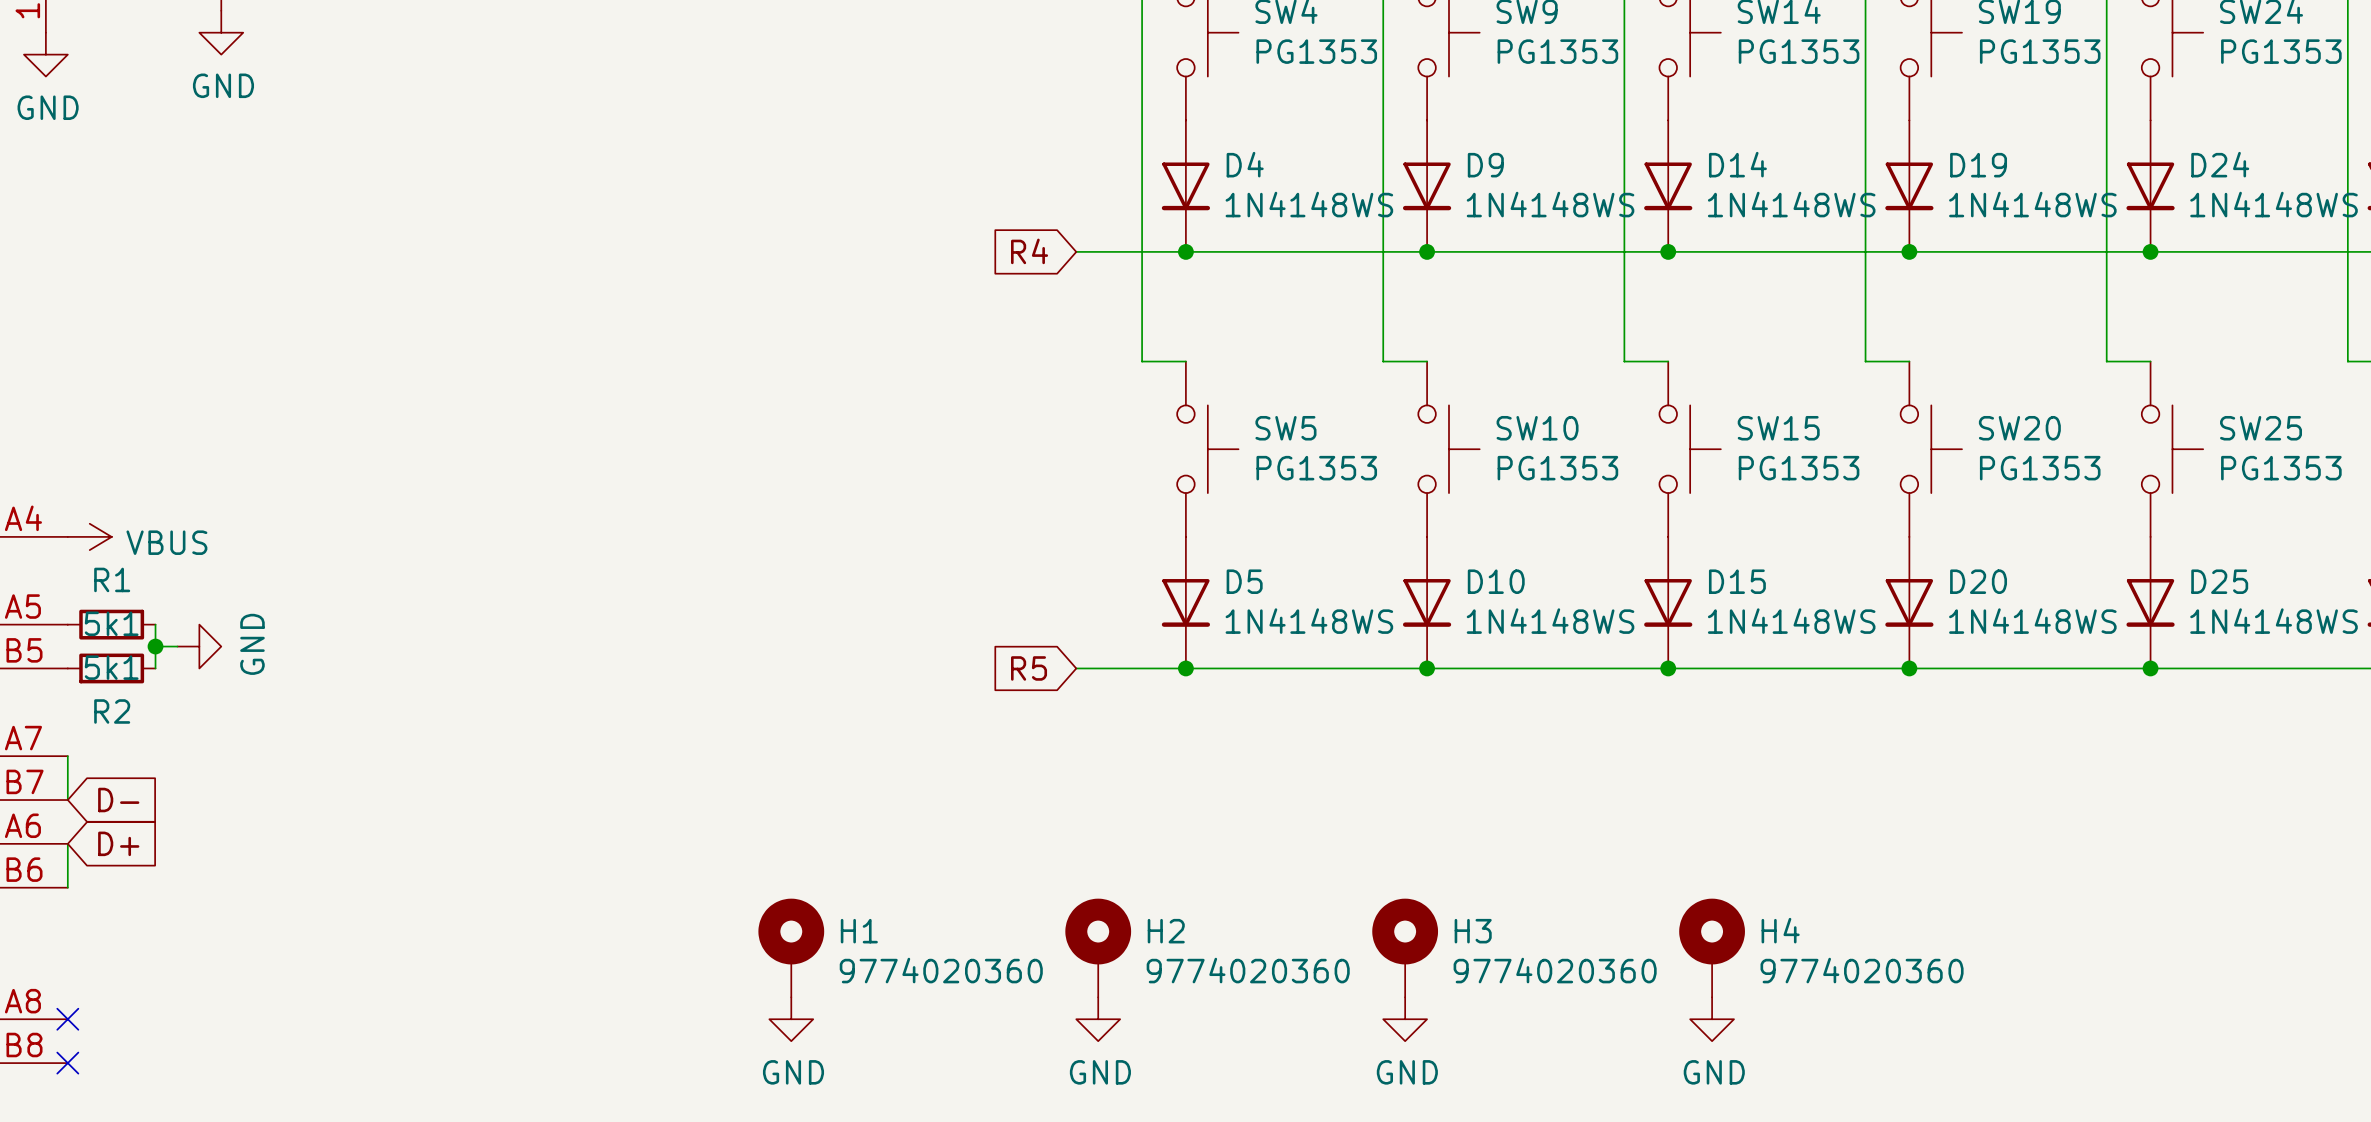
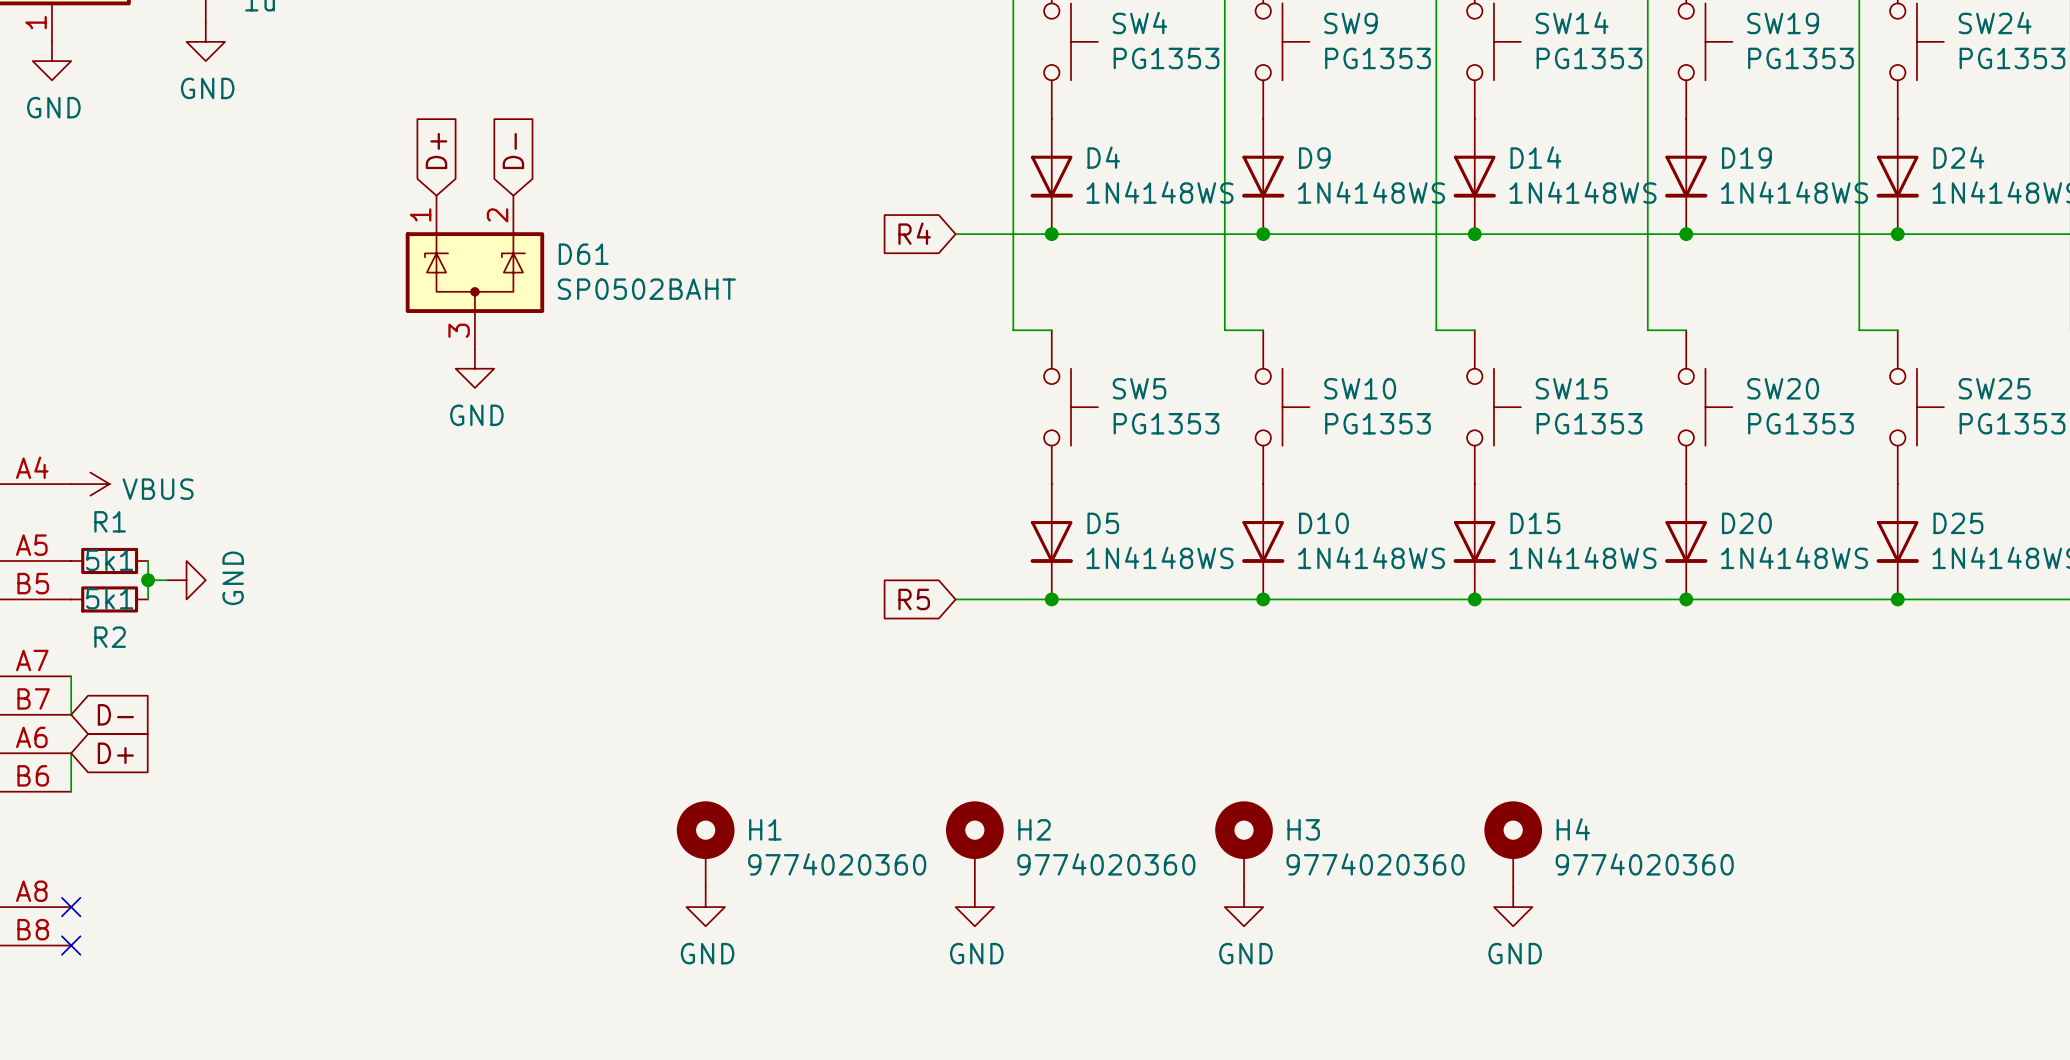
global label: none -> D+ (436, 151)
global label: none -> D- (513, 151)
D61: none -> SP0502BAHT (474, 272)
power symbol: none -> GND (474, 368)

